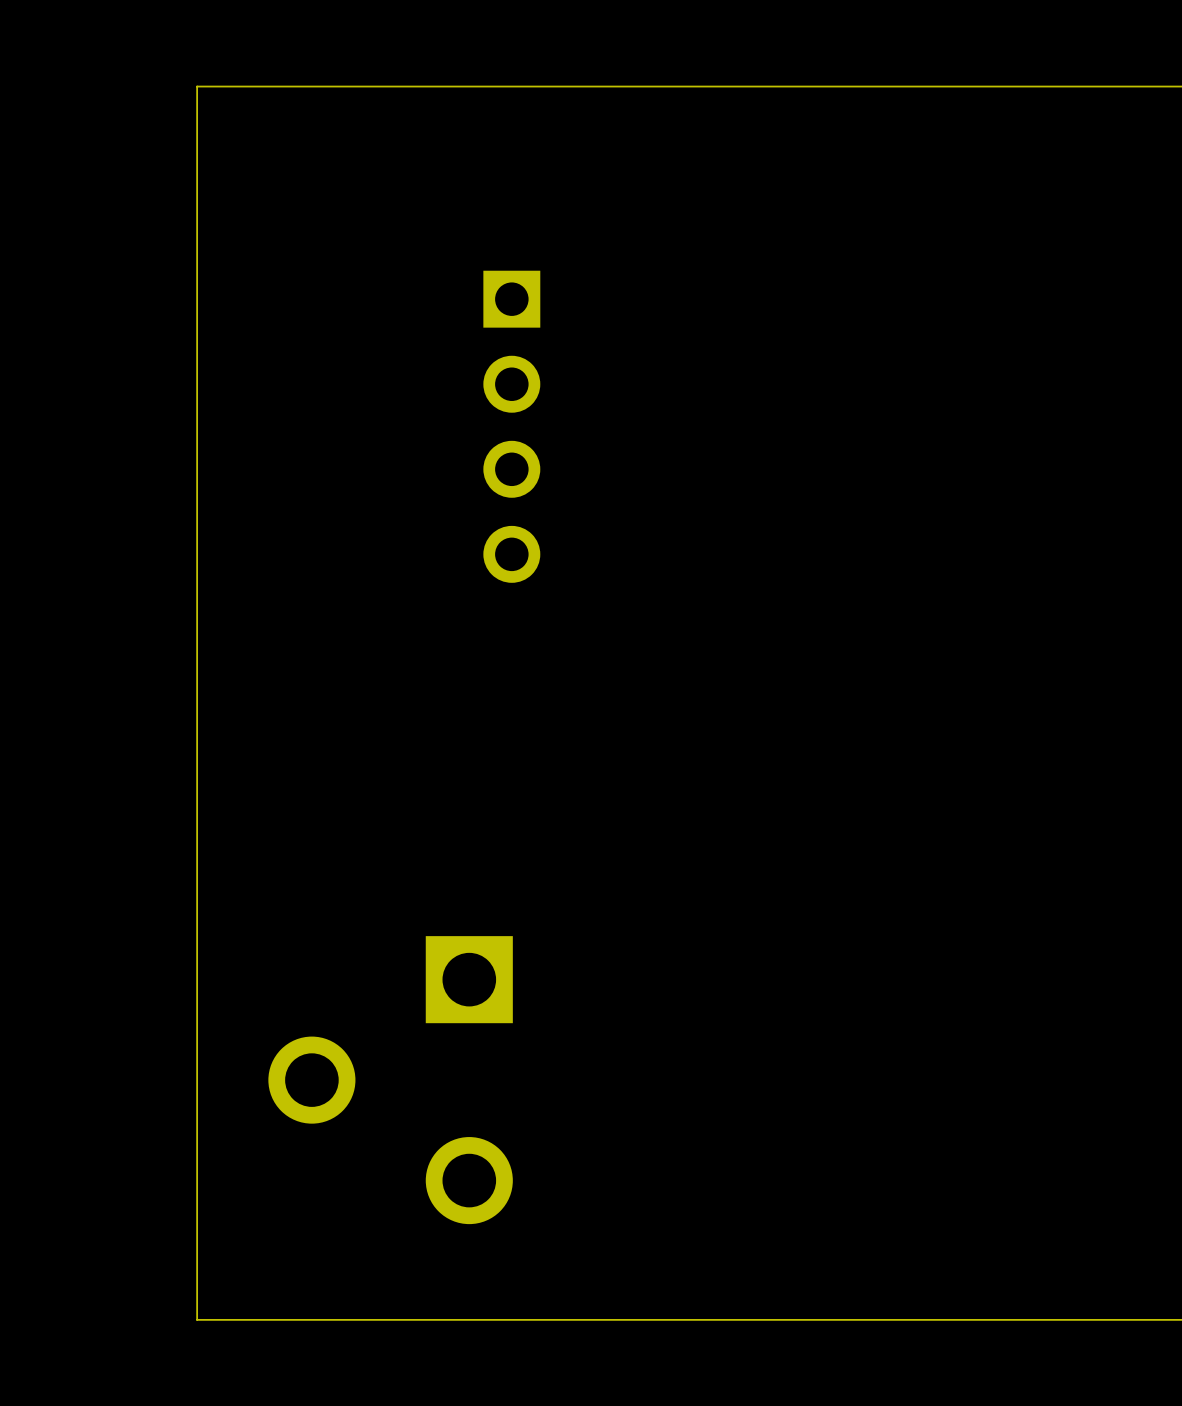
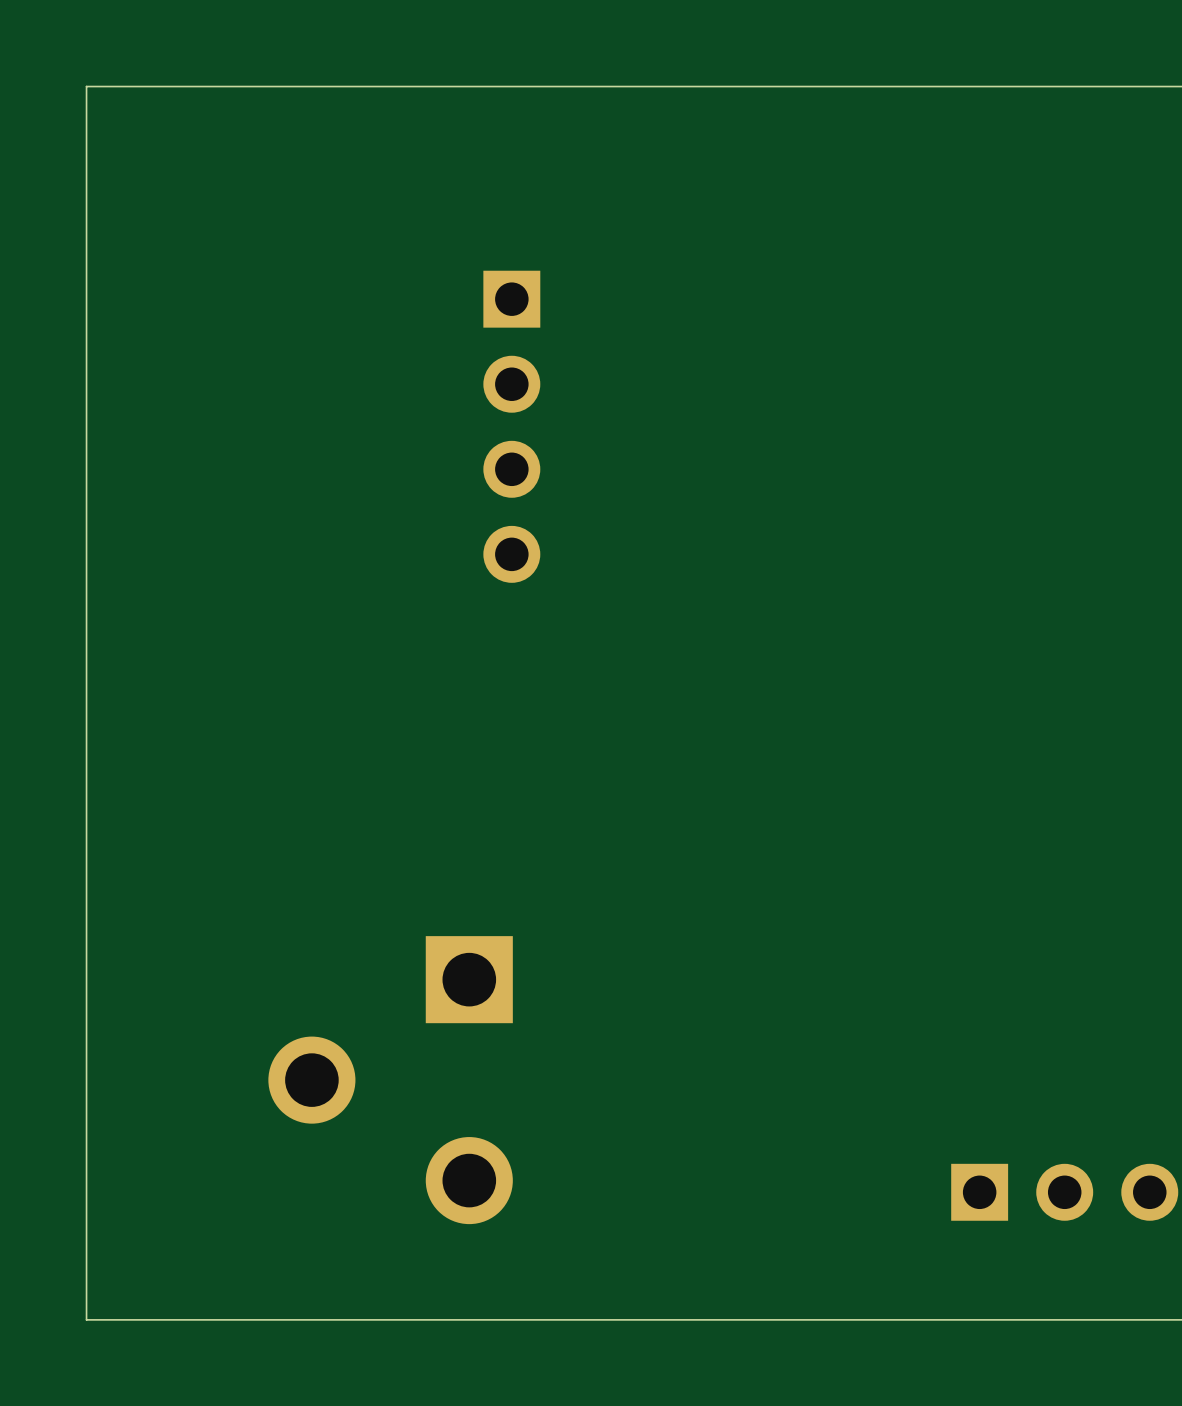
board edge: (197, 86) (197, 1319) -> (197, 86) (86, 86) (86, 1319) (197, 1319)
part: none -> (1064, 1192)

